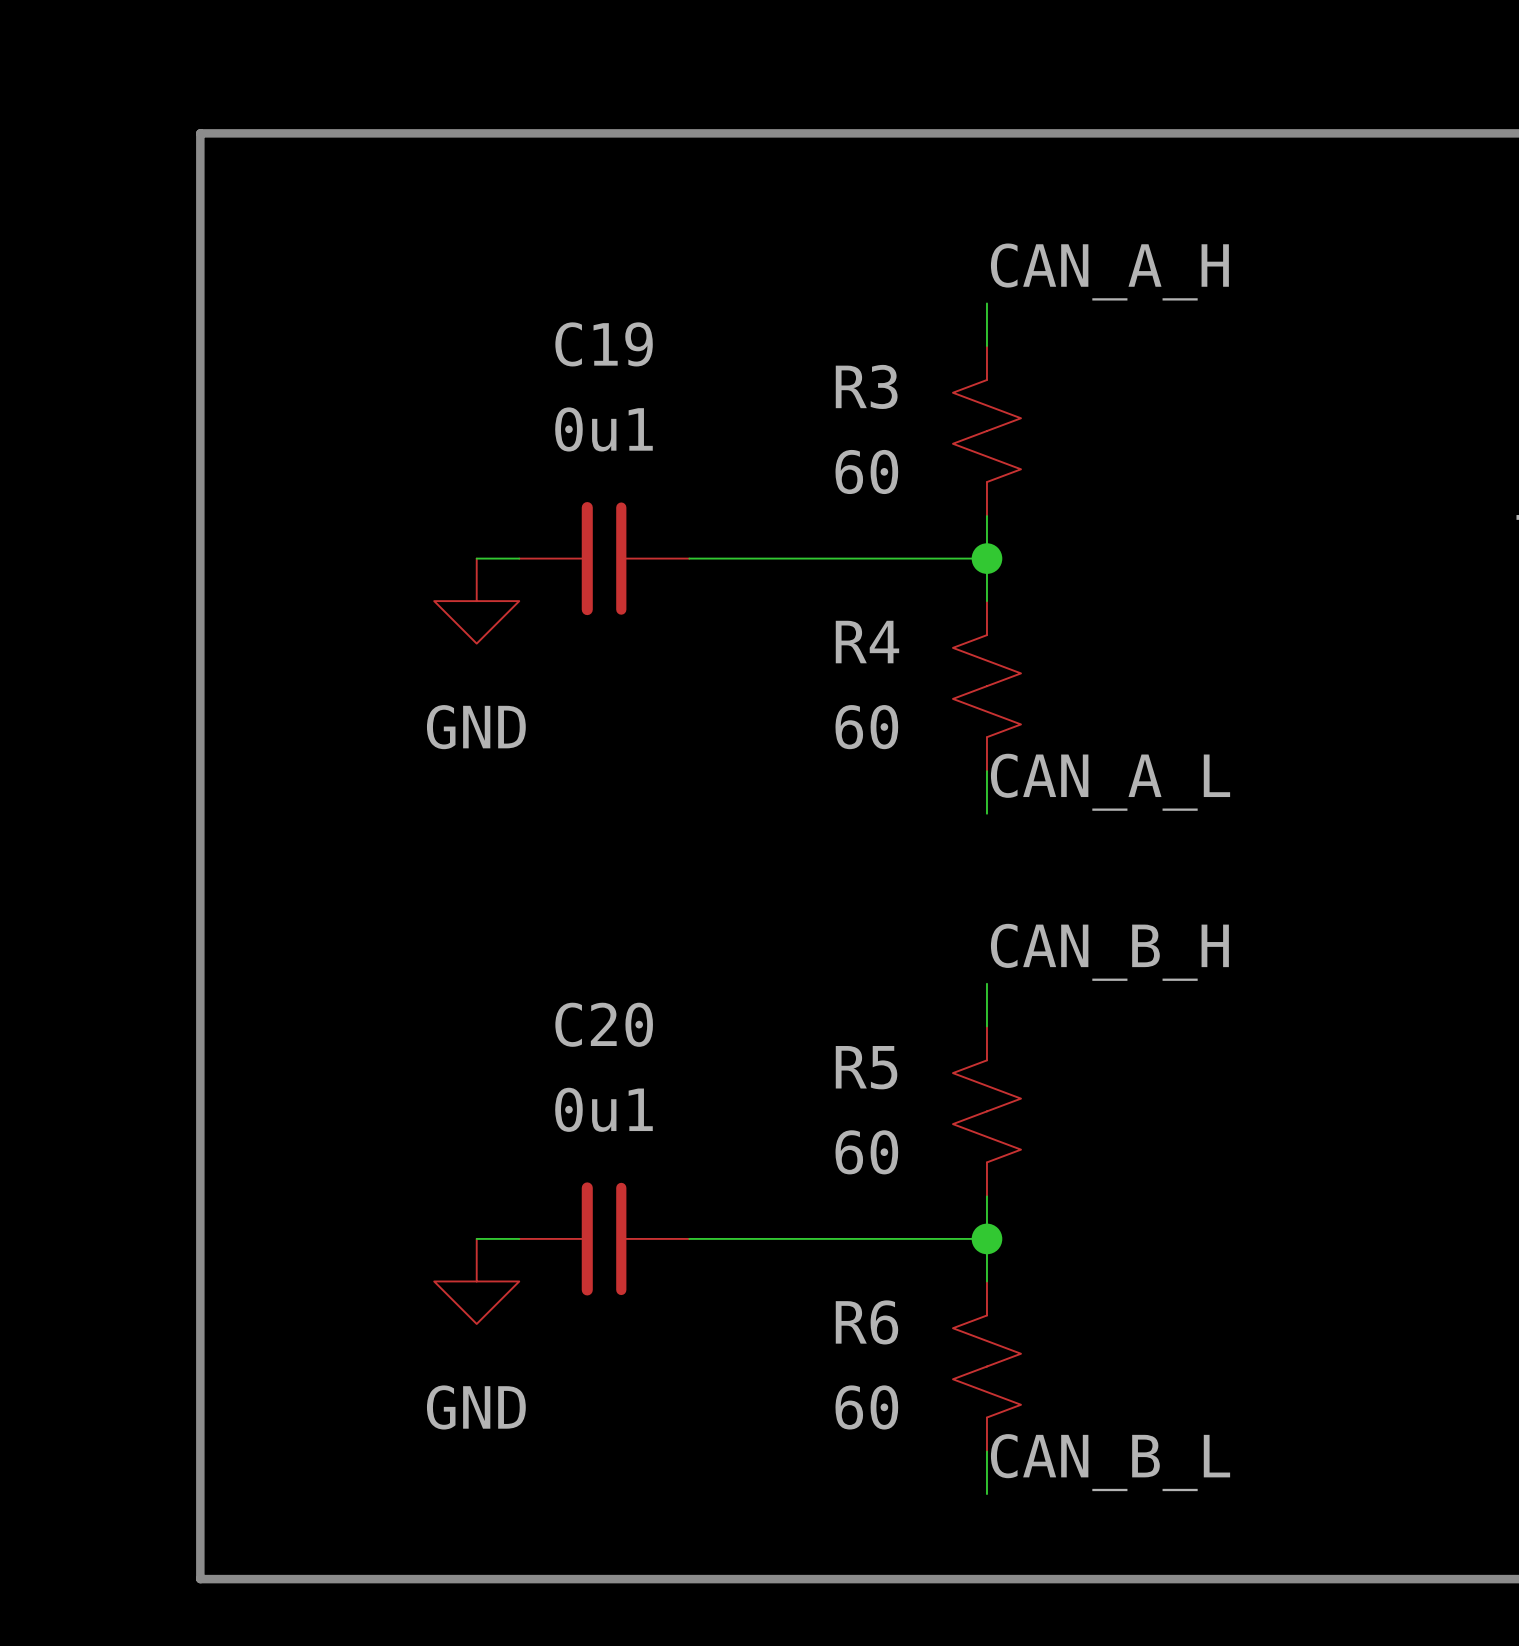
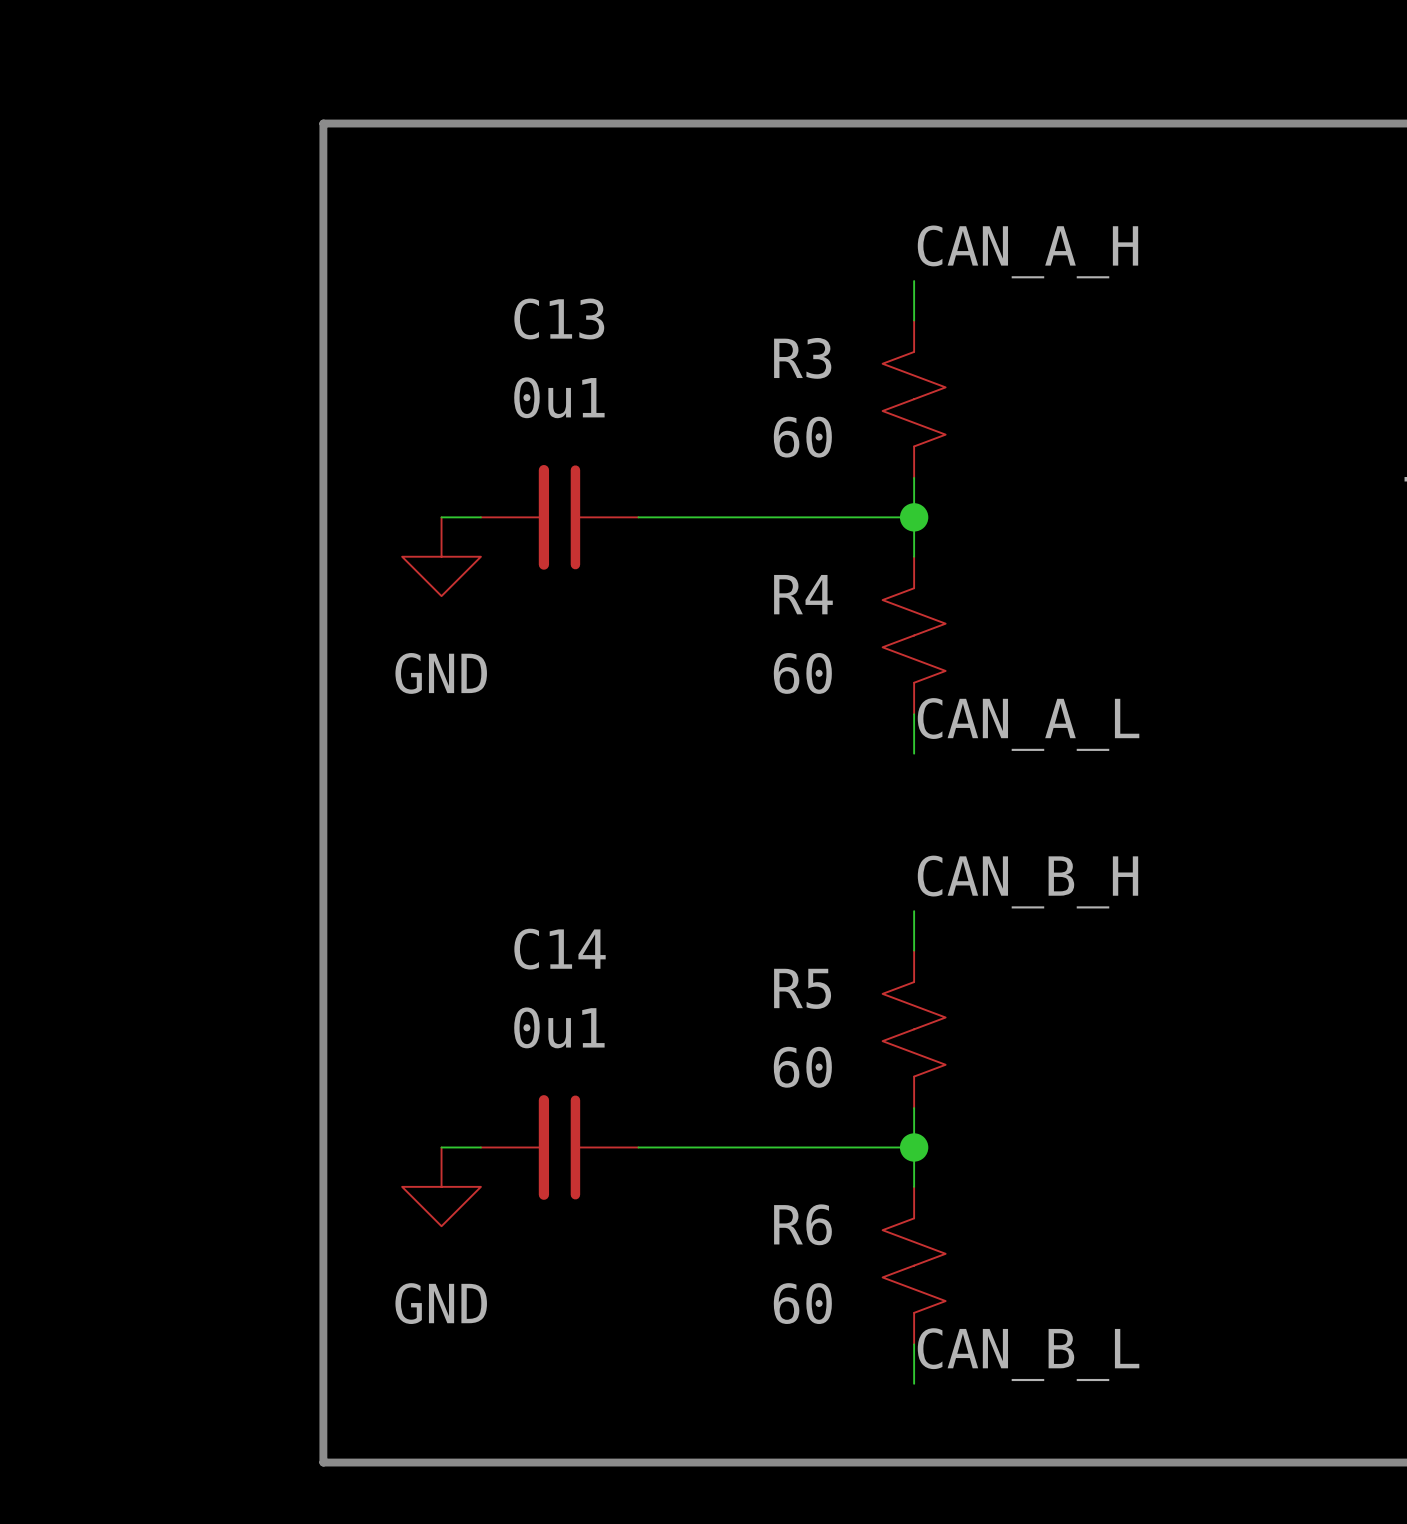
line: (349, 133) (200, 133) (200, 1579) (349, 1579) -> (323, 123) (323, 1462)
C19 name: C19 (604, 344) -> C13 (559, 318)
C20 name: C20 (604, 1024) -> C14 (560, 949)

